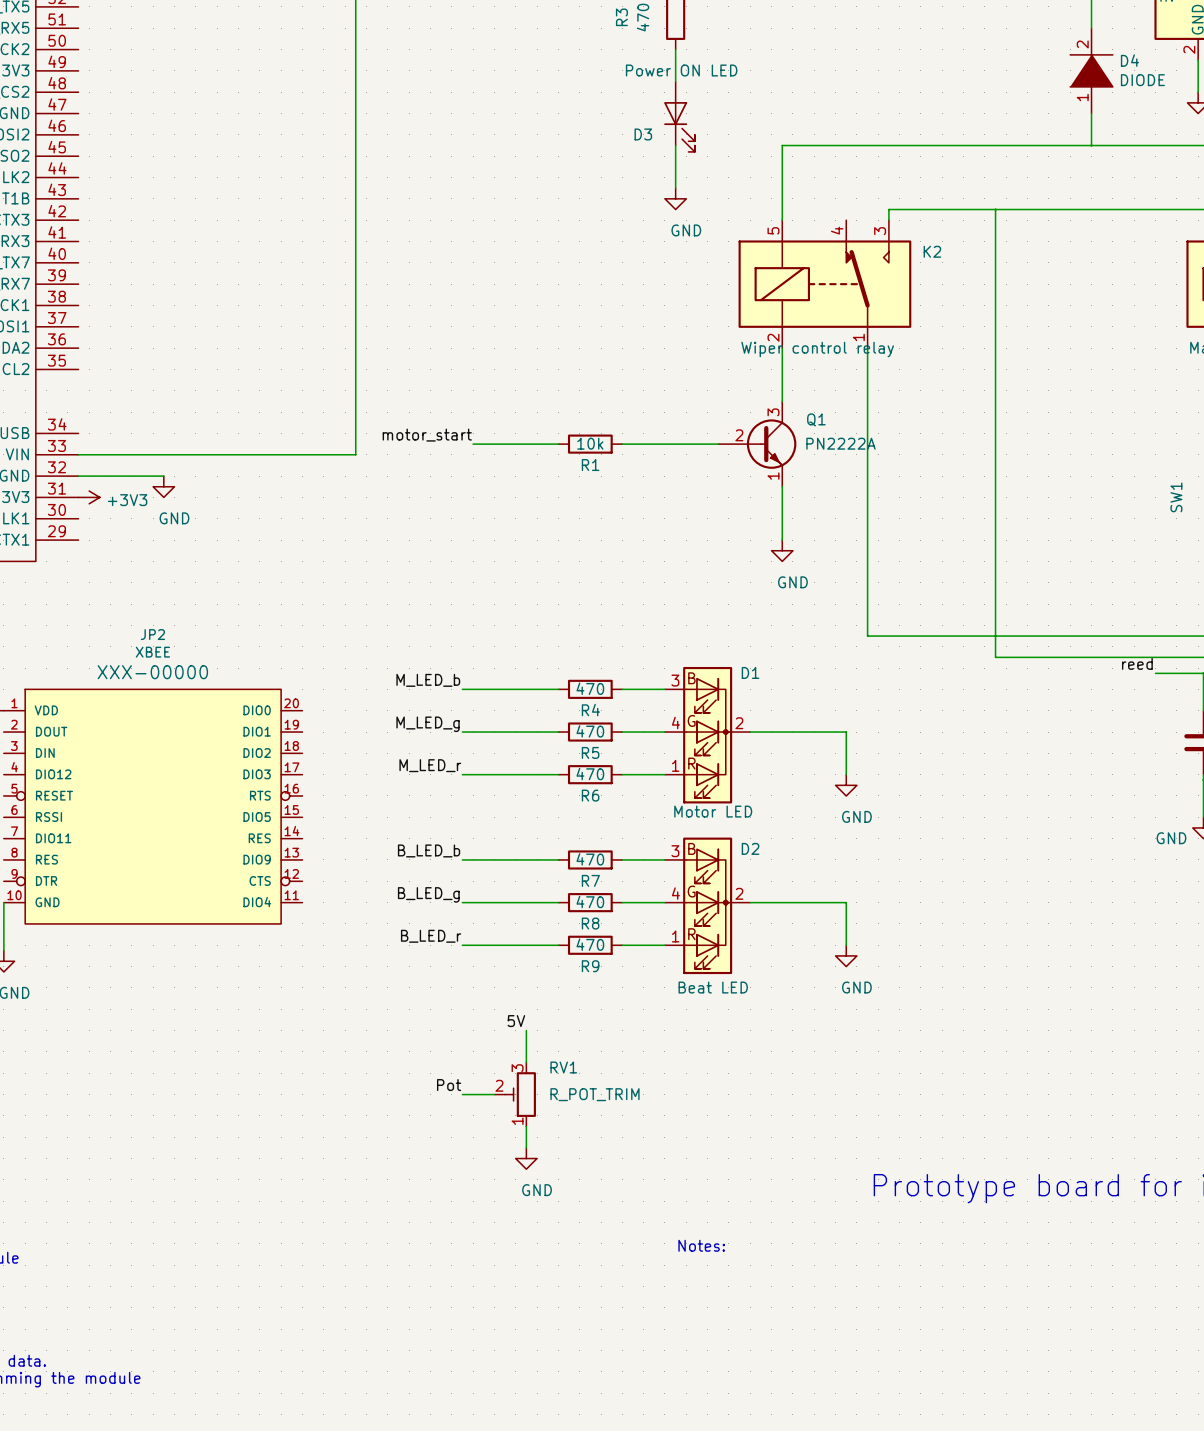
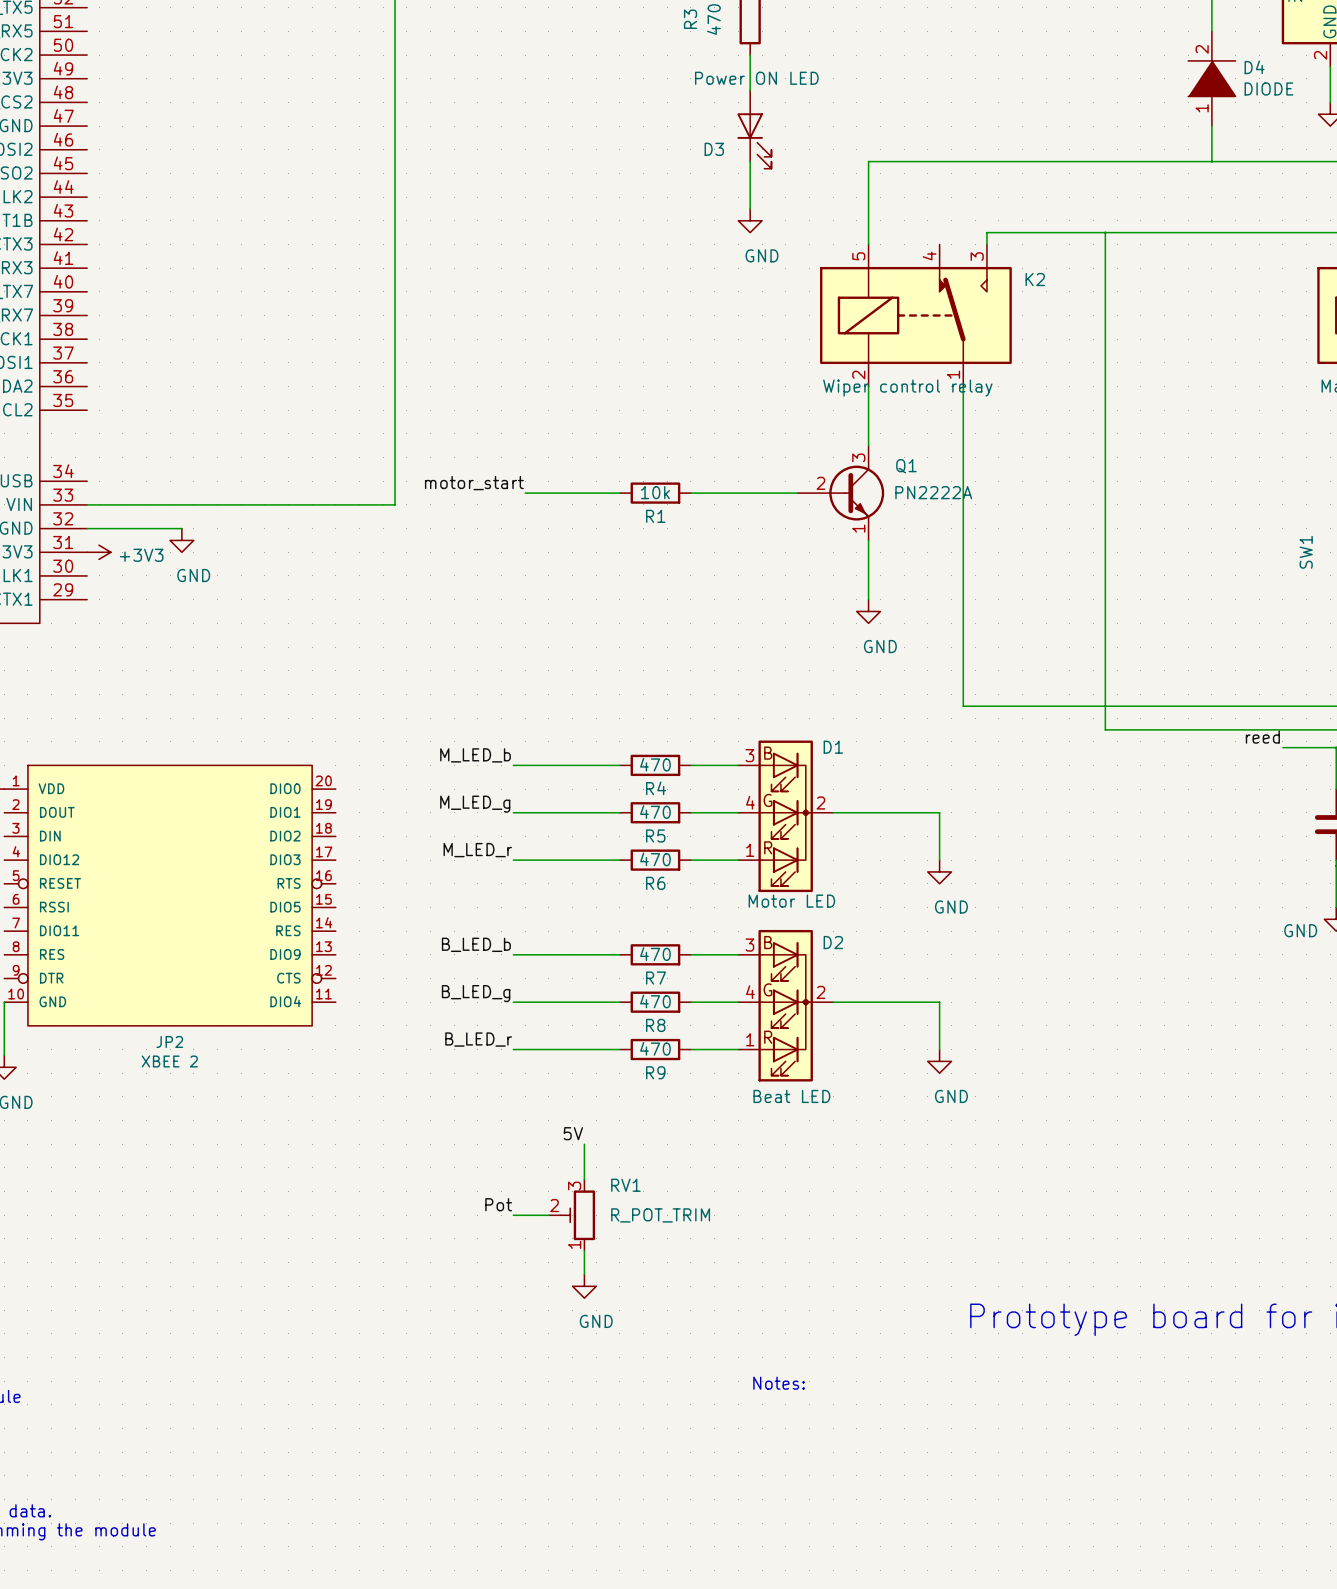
JP2 name position: JP2 (152, 634) -> JP2 (169, 1041)
JP2 value: XBEE (152, 652) -> XBEE 2 (169, 1061)
JP2 text: XXX-00000 (152, 672) -> none

